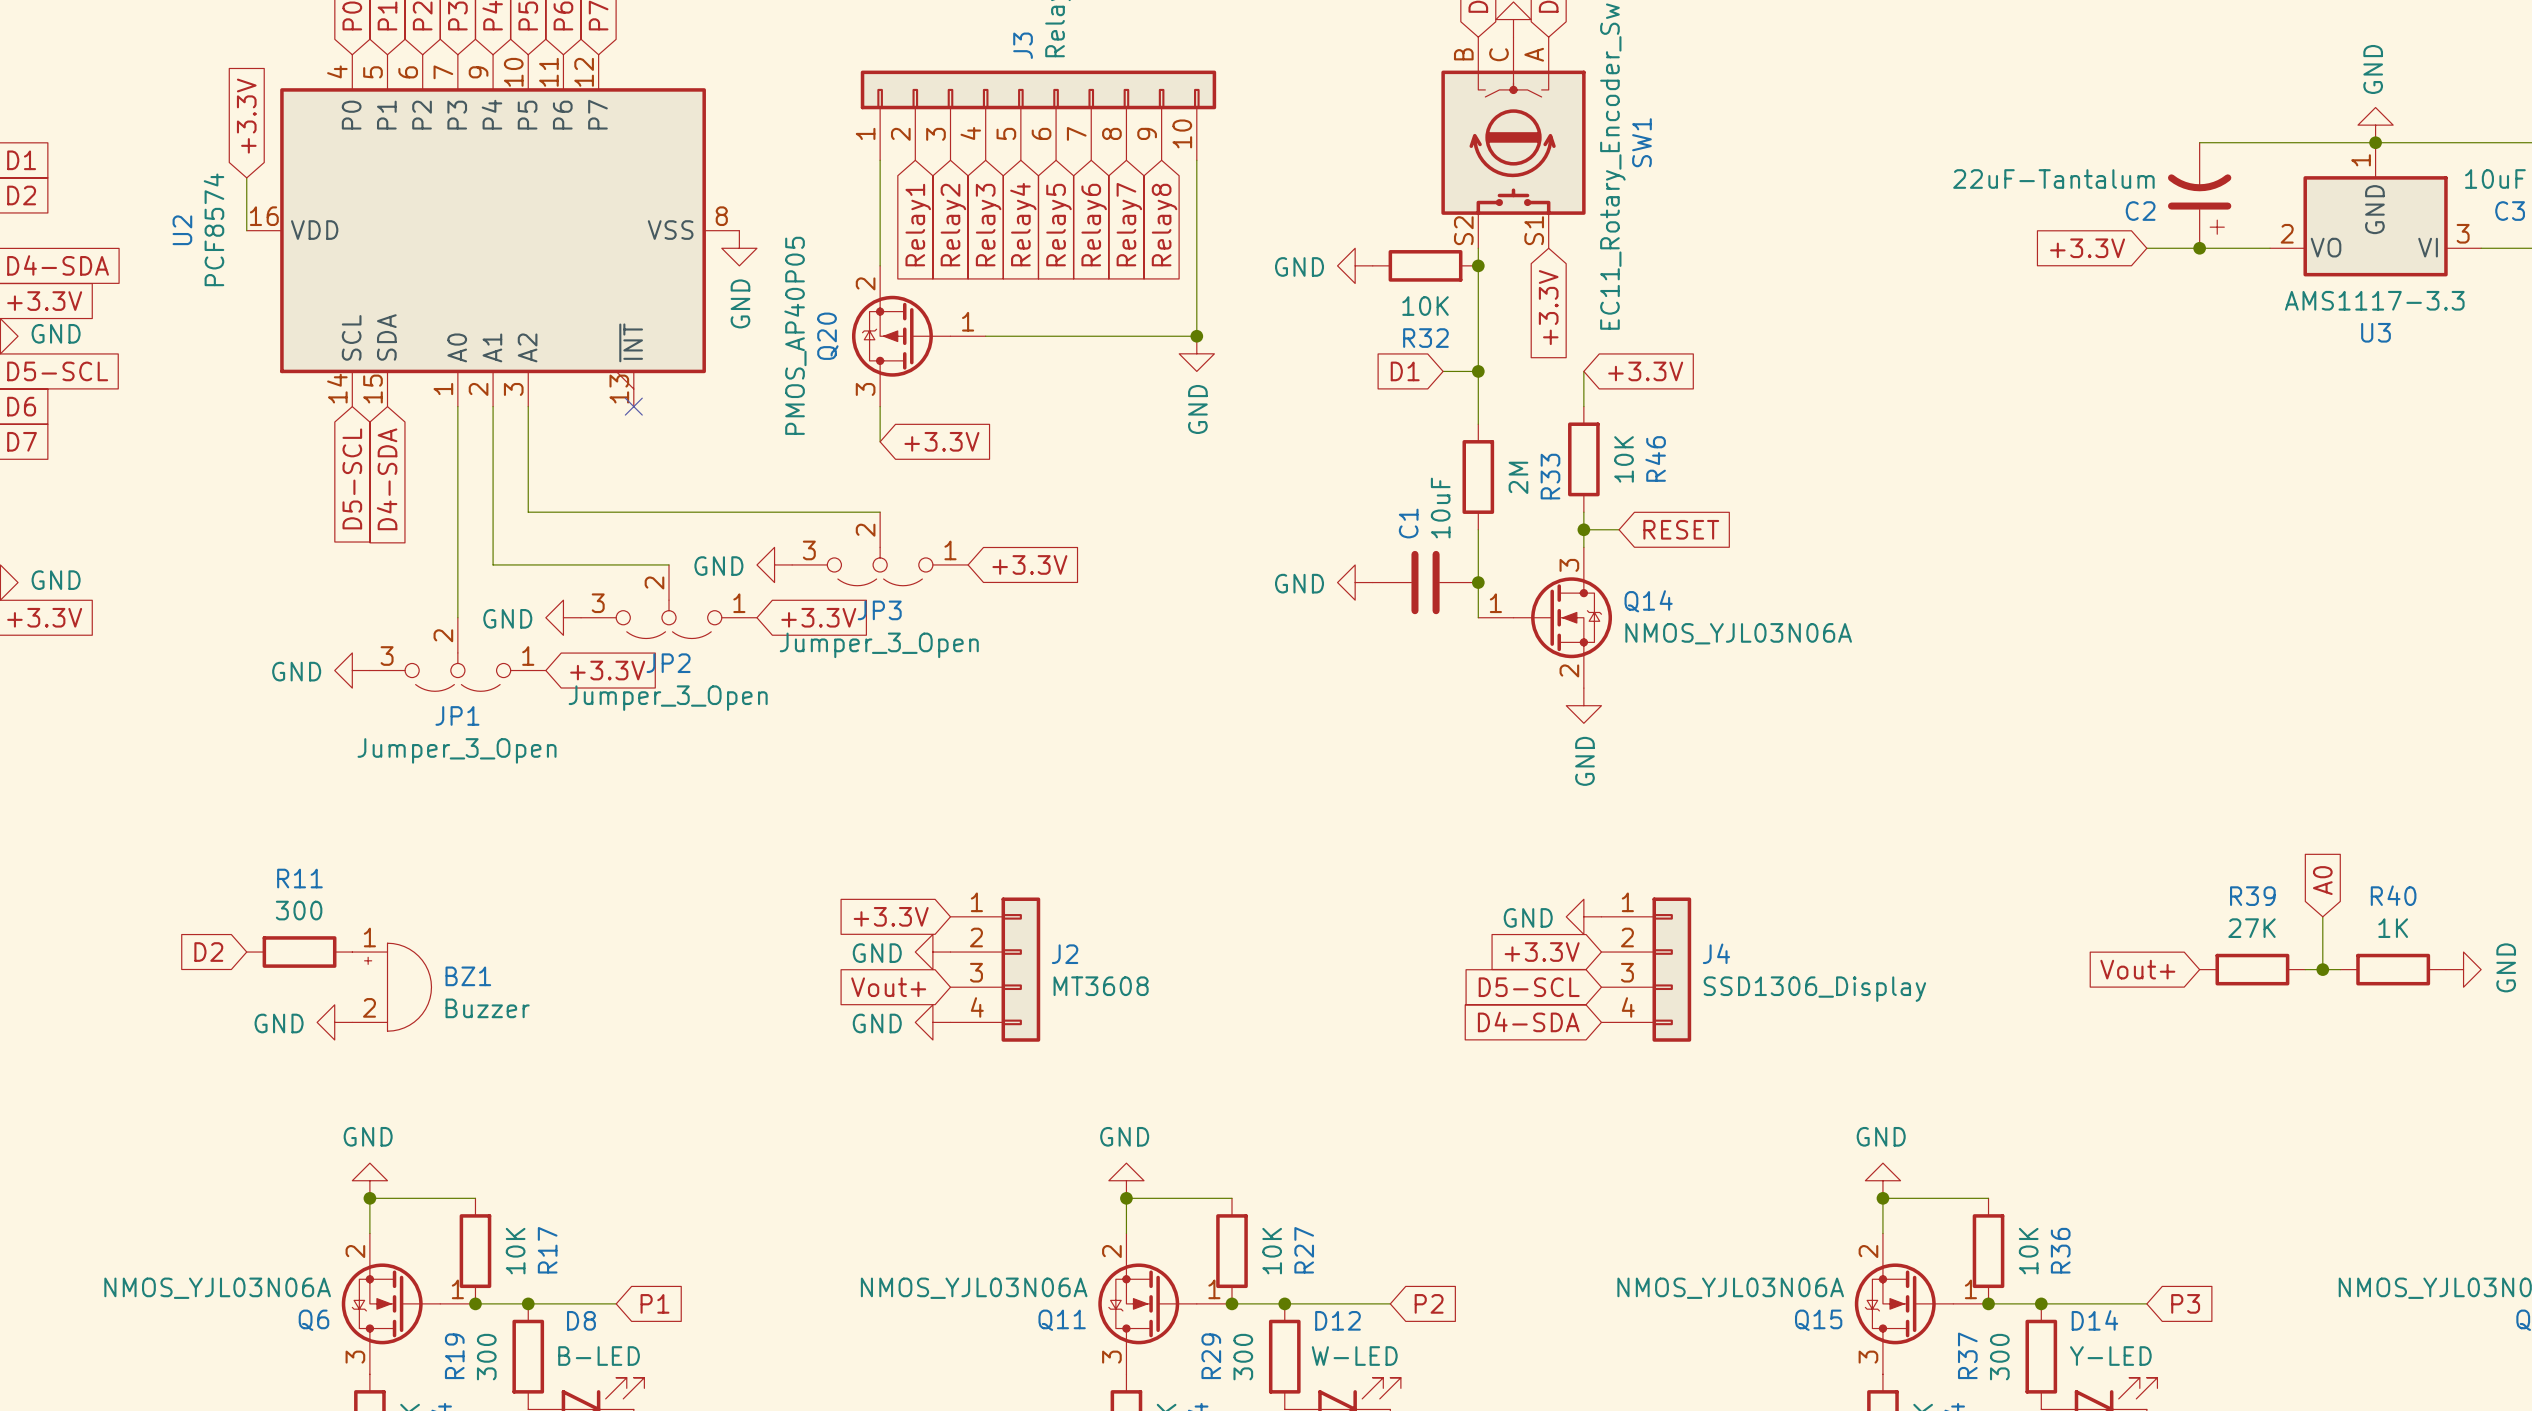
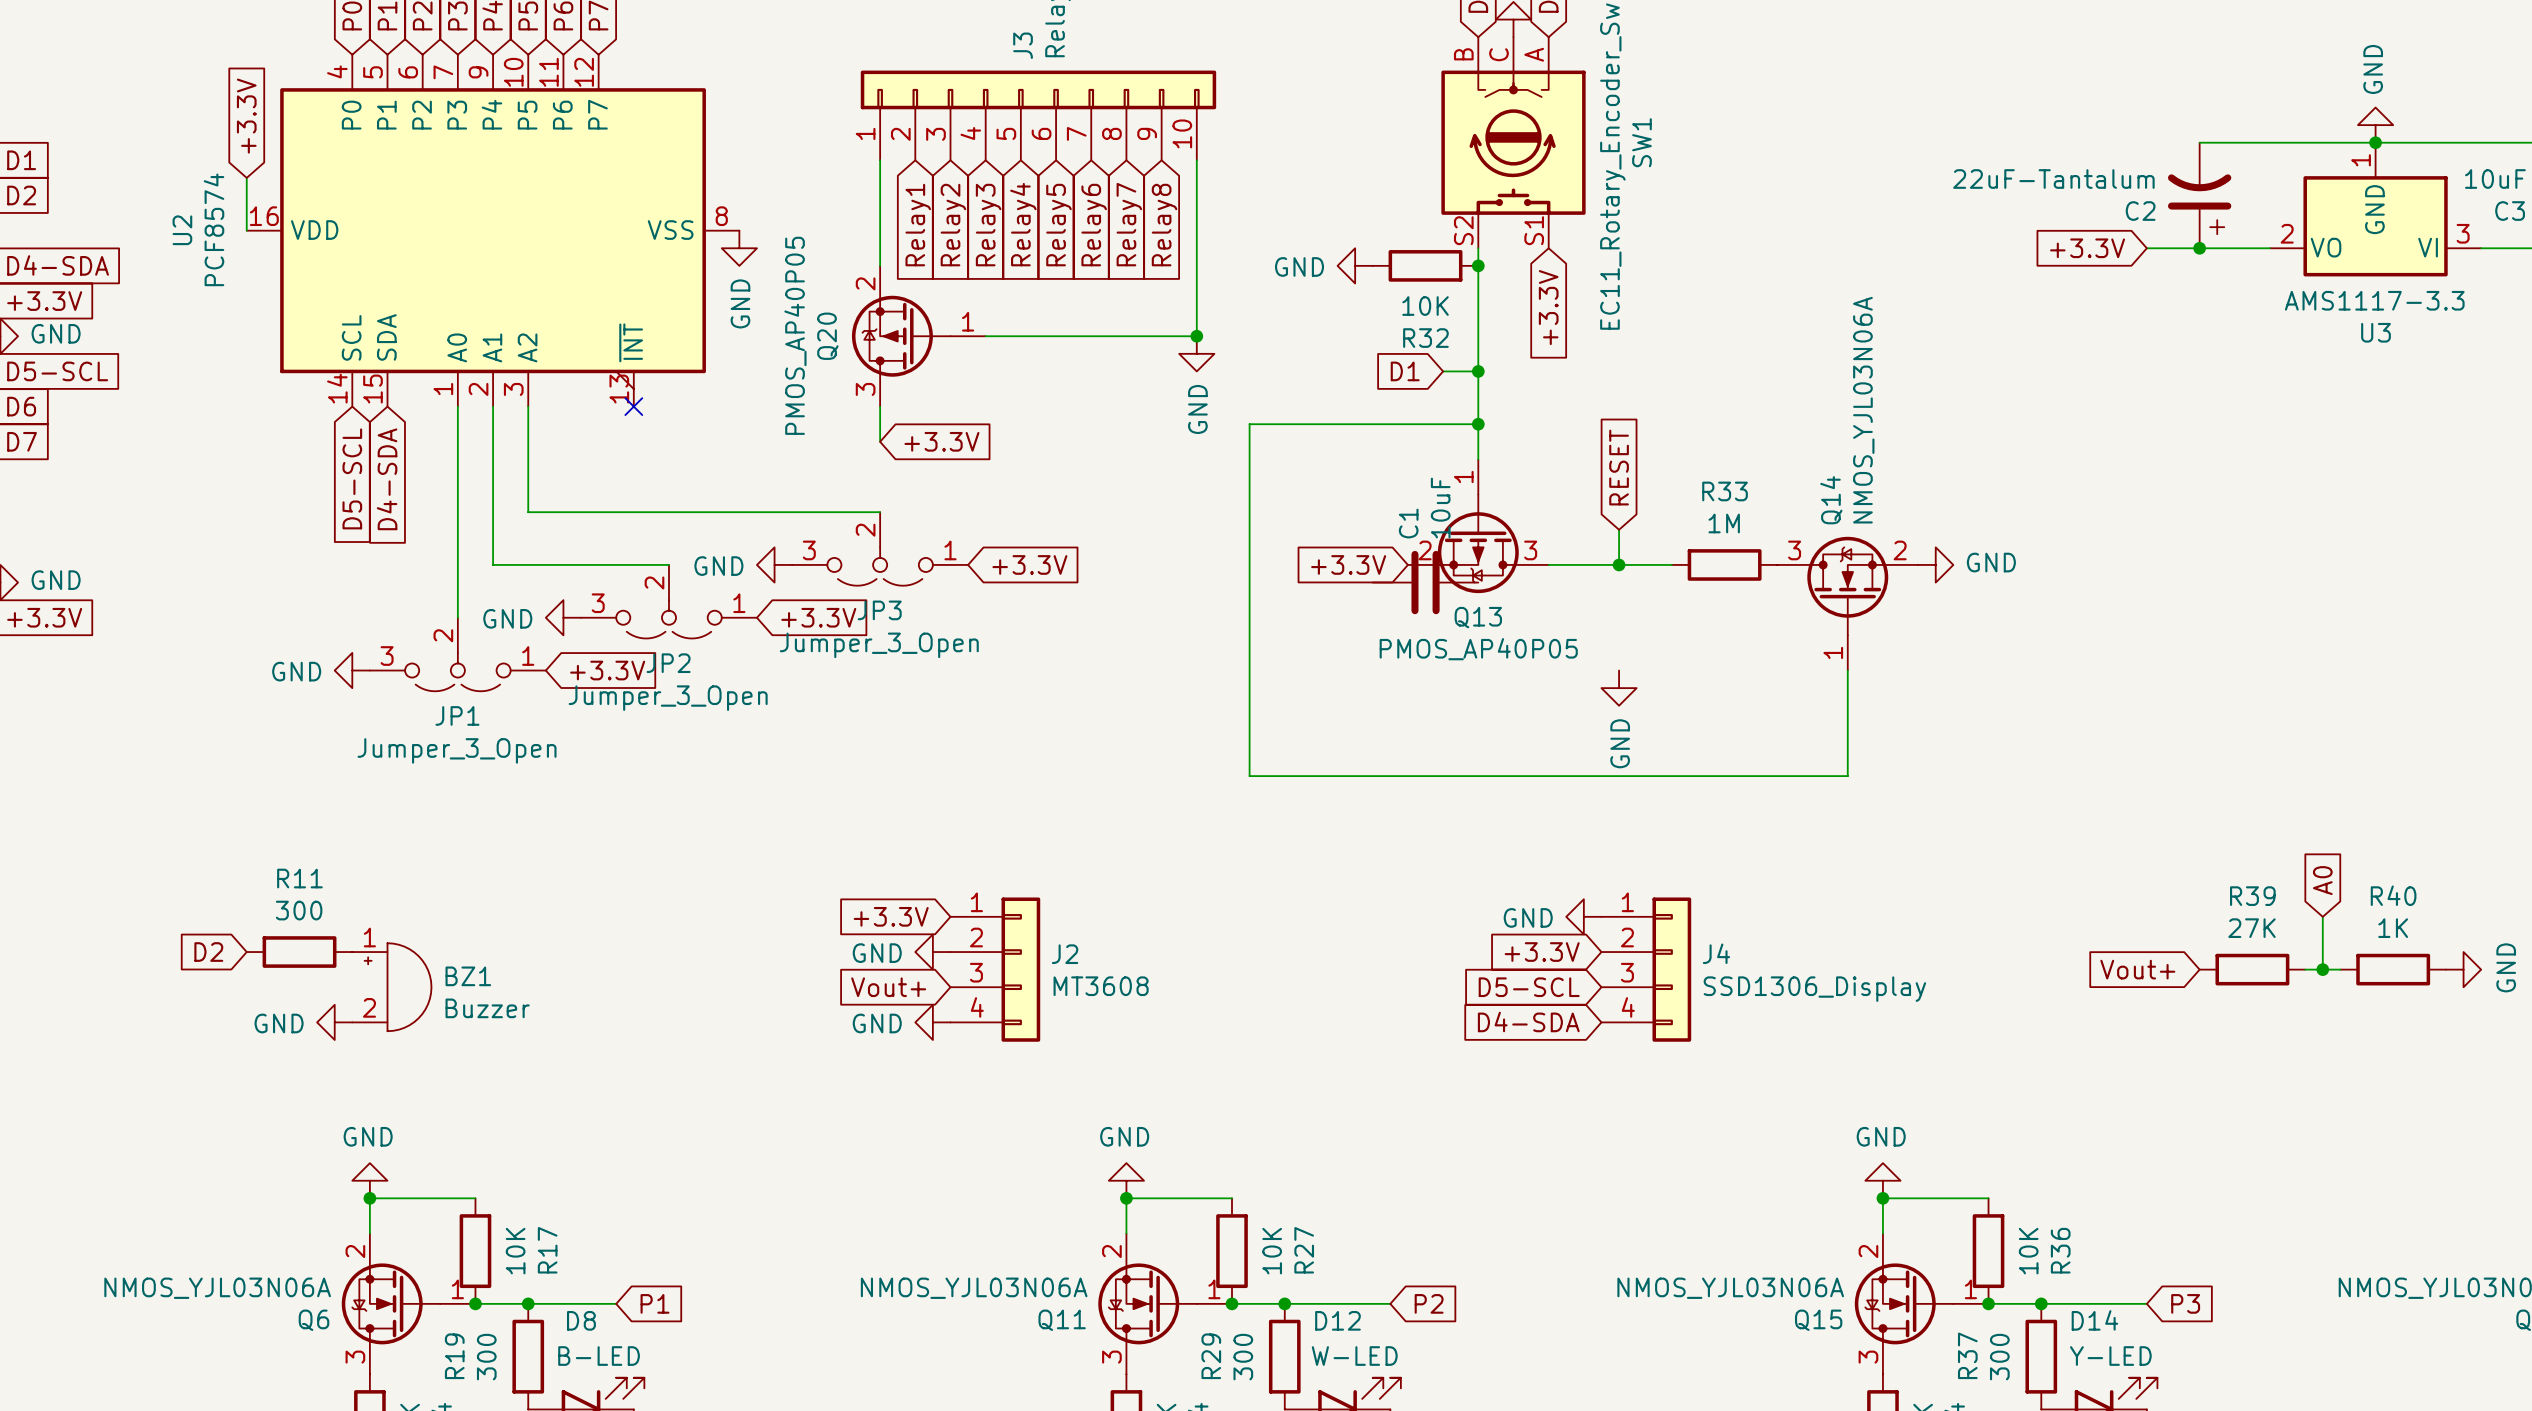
wire: (1583, 371) (1583, 406) -> none
global label rotation: 0° (1645, 371) -> 180° (1348, 564)
global label position: +3.3V (1645, 371) -> +3.3V (1348, 564)
junction: none -> (1478, 424)
wire: none -> (1478, 459) (1478, 424) (1249, 424) (1249, 776) (1847, 776) (1847, 670)
R46: 10K (1583, 459) -> none
R33 rotation: 0° (1478, 476) -> 90° clockwise (1724, 564)
R33 position: (1478, 476) -> (1724, 564)
R33 name position: R33 (1550, 476) -> R33 (1725, 491)
R33 value: 2M (1518, 477) -> 1M (1724, 523)
wire: (1583, 512) (1583, 547) -> none
Q13: none -> PMOS_AP40P05 (1478, 526)
wire: (1478, 529) (1478, 617) -> none
wire: (1583, 529) (1619, 529) -> (1619, 564) (1619, 529)
junction position: (1583, 529) -> (1619, 564)
global label rotation: 0° (1681, 529) -> 90° counterclockwise (1619, 467)
wire: none -> (1548, 564) (1671, 564)
power symbol: none -> GND (1935, 564)
power symbol: GND (1355, 582) -> none
junction: (1478, 582) -> none
Q14 position: (1545, 617) -> (1847, 603)
Q14 rotation: 0° (1562, 617) -> 90° counterclockwise (1847, 586)
power symbol position: GND (1583, 705) -> GND (1619, 688)

